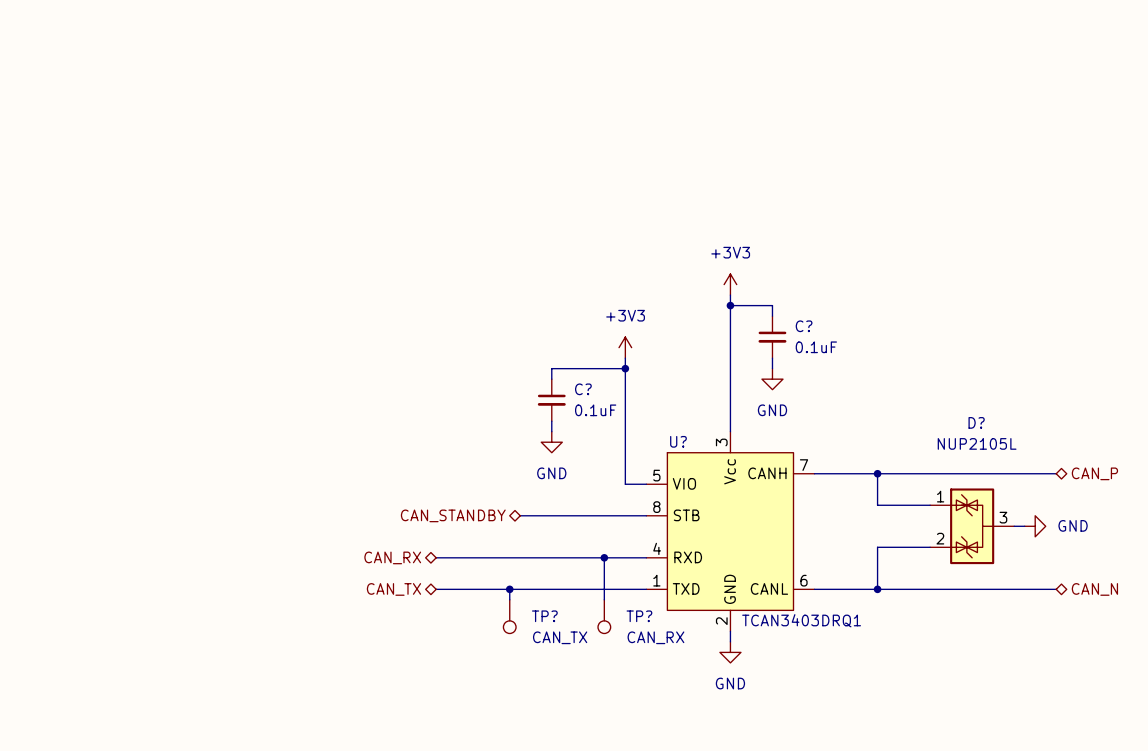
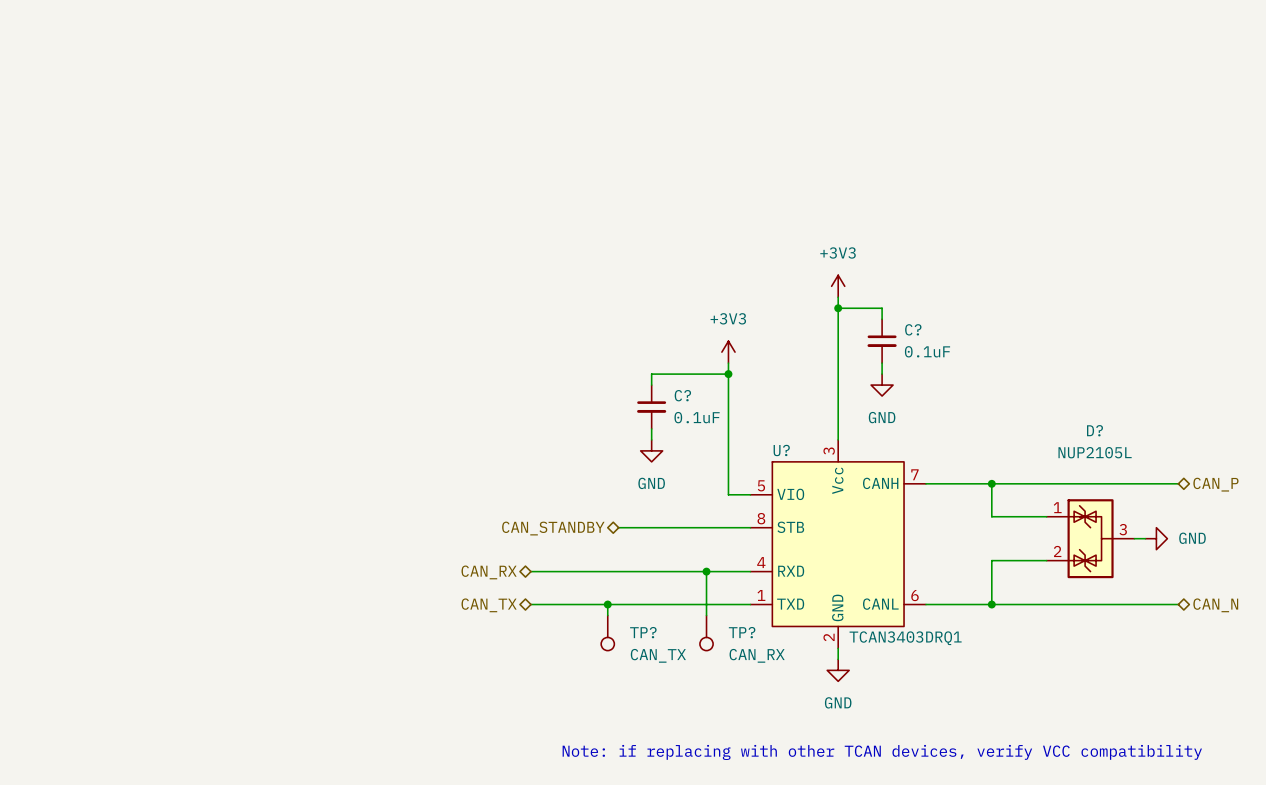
text: none -> Note: if replacing with other TCAN devices, verify VCC compatibility (882, 752)

